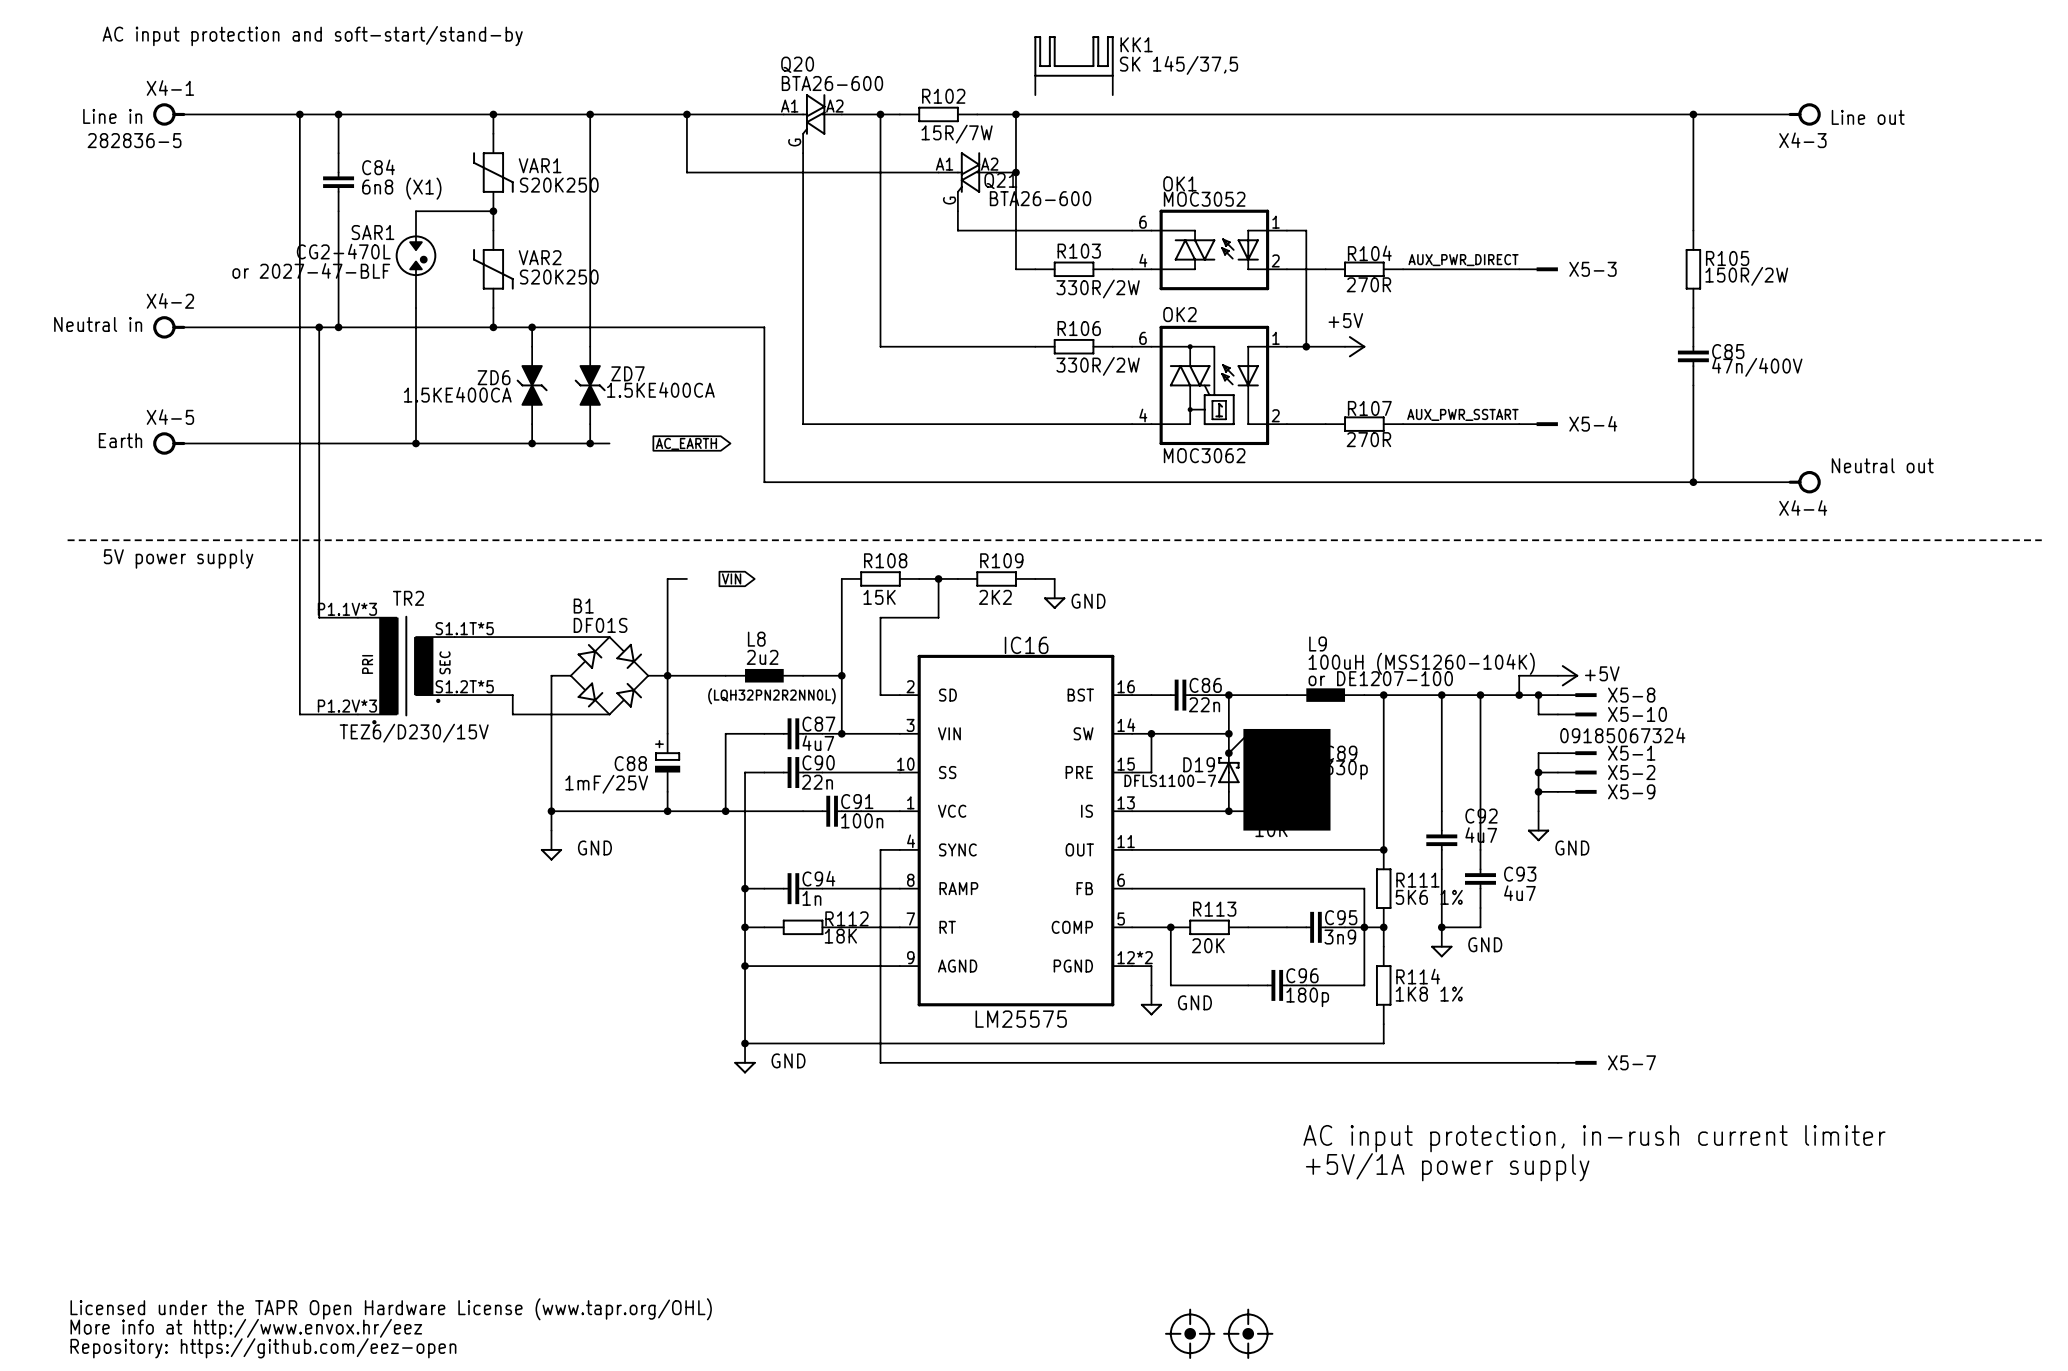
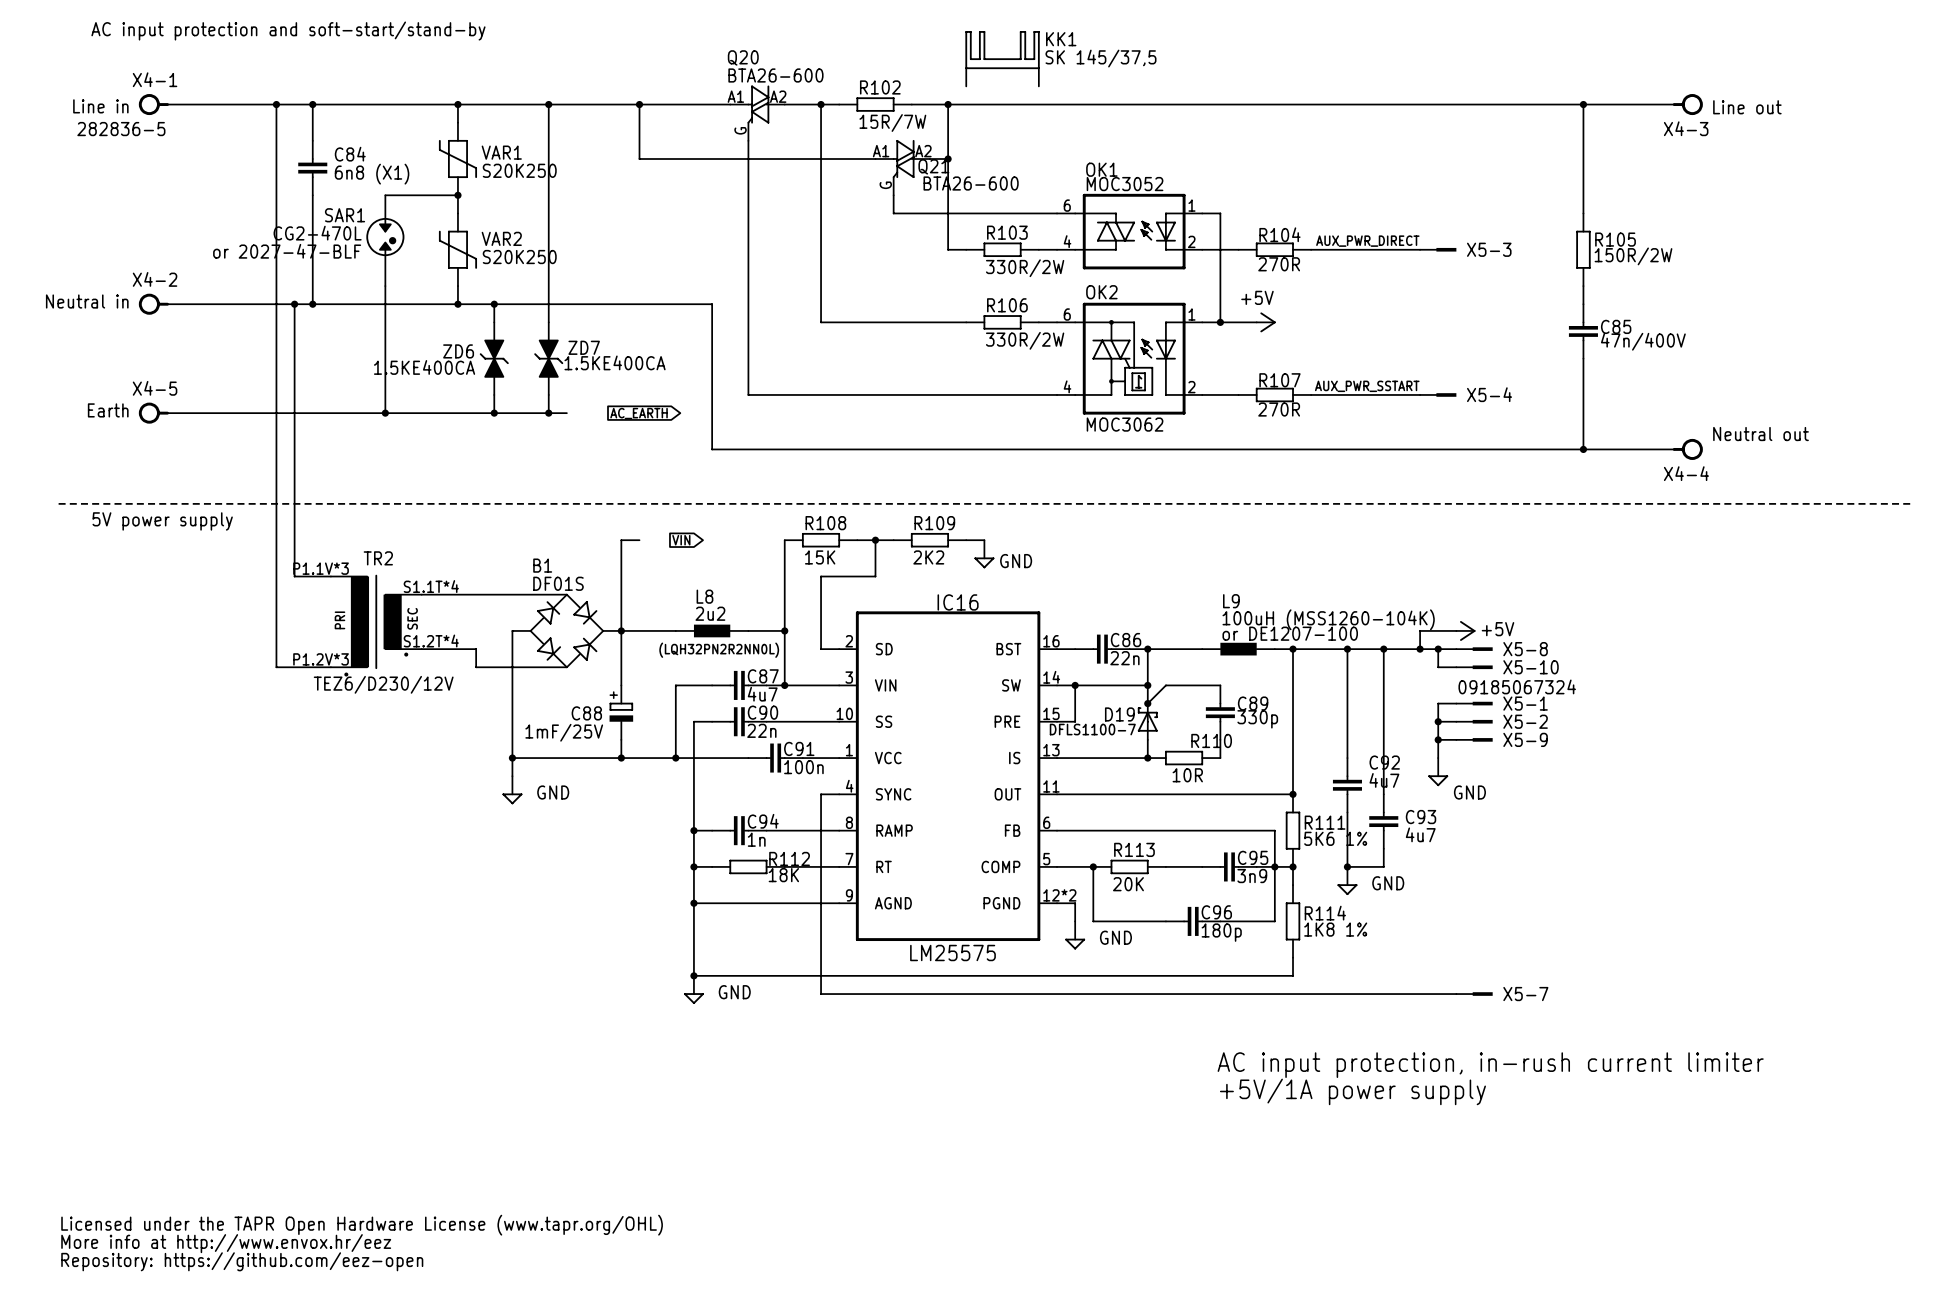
TR2 pin number: S1.1T*5 (464, 628) -> S1.1T*4 (431, 586)
TR2 pin number: S1.2T*5 (464, 686) -> S1.2T*4 (431, 641)
drawing: [1243, 728, 1331, 831] -> none
TR2 value: TEZ6/D230/15V (414, 733) -> TEZ6/D230/12V (383, 684)
part: (1190, 1333) -> none
part: (1248, 1333) -> none

